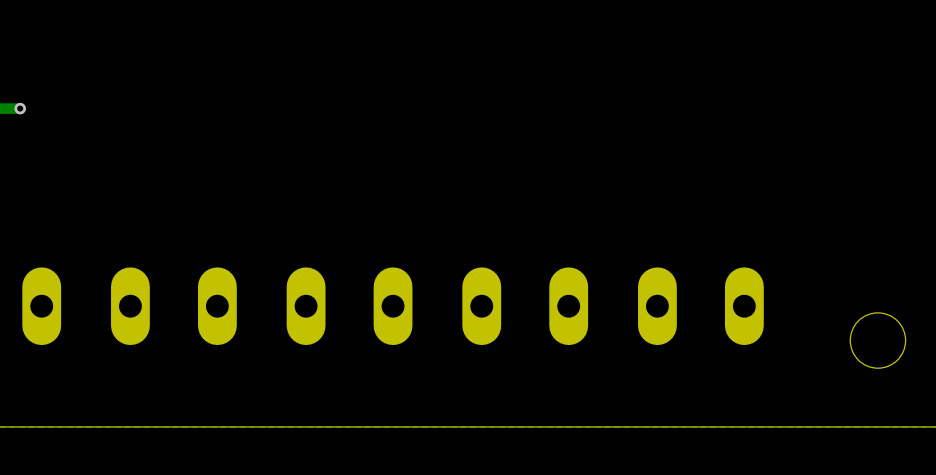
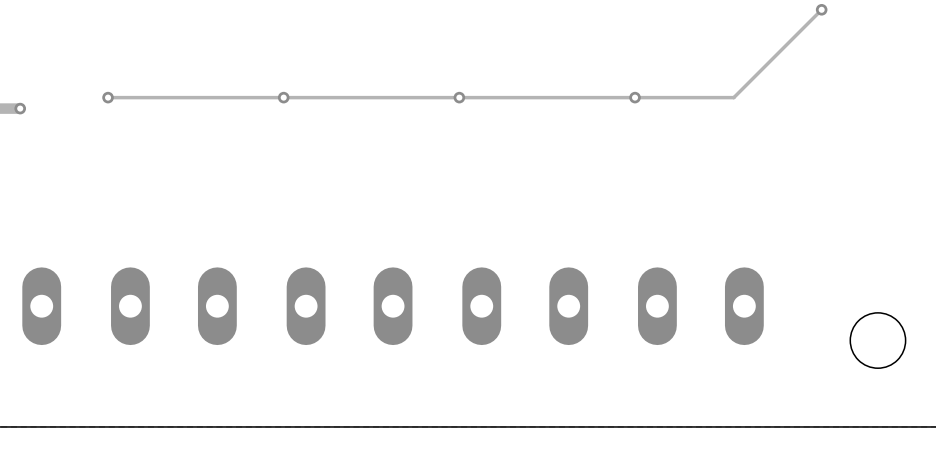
track: none -> (821, 9) (733, 97) (108, 97)
via: none -> (821, 9)
via: none -> (108, 97)
via: none -> (283, 97)
via: none -> (459, 97)
via: none -> (635, 97)

